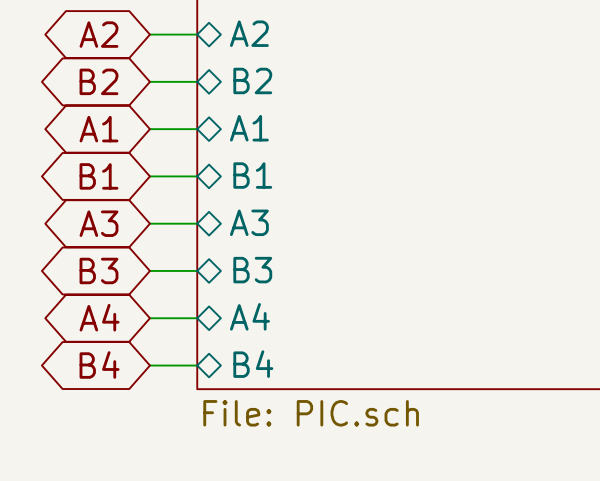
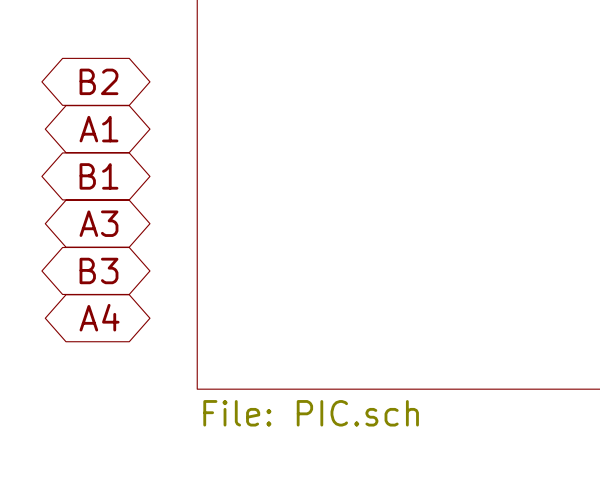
sheet pin: A2 (249, 33) -> none
global label: A2 (98, 34) -> none
wire: (149, 34) (197, 34) -> none
sheet pin: B2 (252, 80) -> none
wire: (149, 81) (197, 81) -> none
sheet pin: A1 (249, 128) -> none
wire: (149, 129) (197, 129) -> none
sheet pin: B1 (252, 175) -> none
wire: (149, 176) (197, 176) -> none
sheet pin: A3 (249, 222) -> none
wire: (149, 223) (197, 223) -> none
wire: (149, 270) (197, 270) -> none
sheet pin: B3 (252, 270) -> none
sheet pin: A4 (249, 316) -> none
wire: (149, 318) (197, 318) -> none
global label: B4 (99, 364) -> none
sheet pin: B4 (253, 364) -> none
wire: (149, 365) (197, 365) -> none

